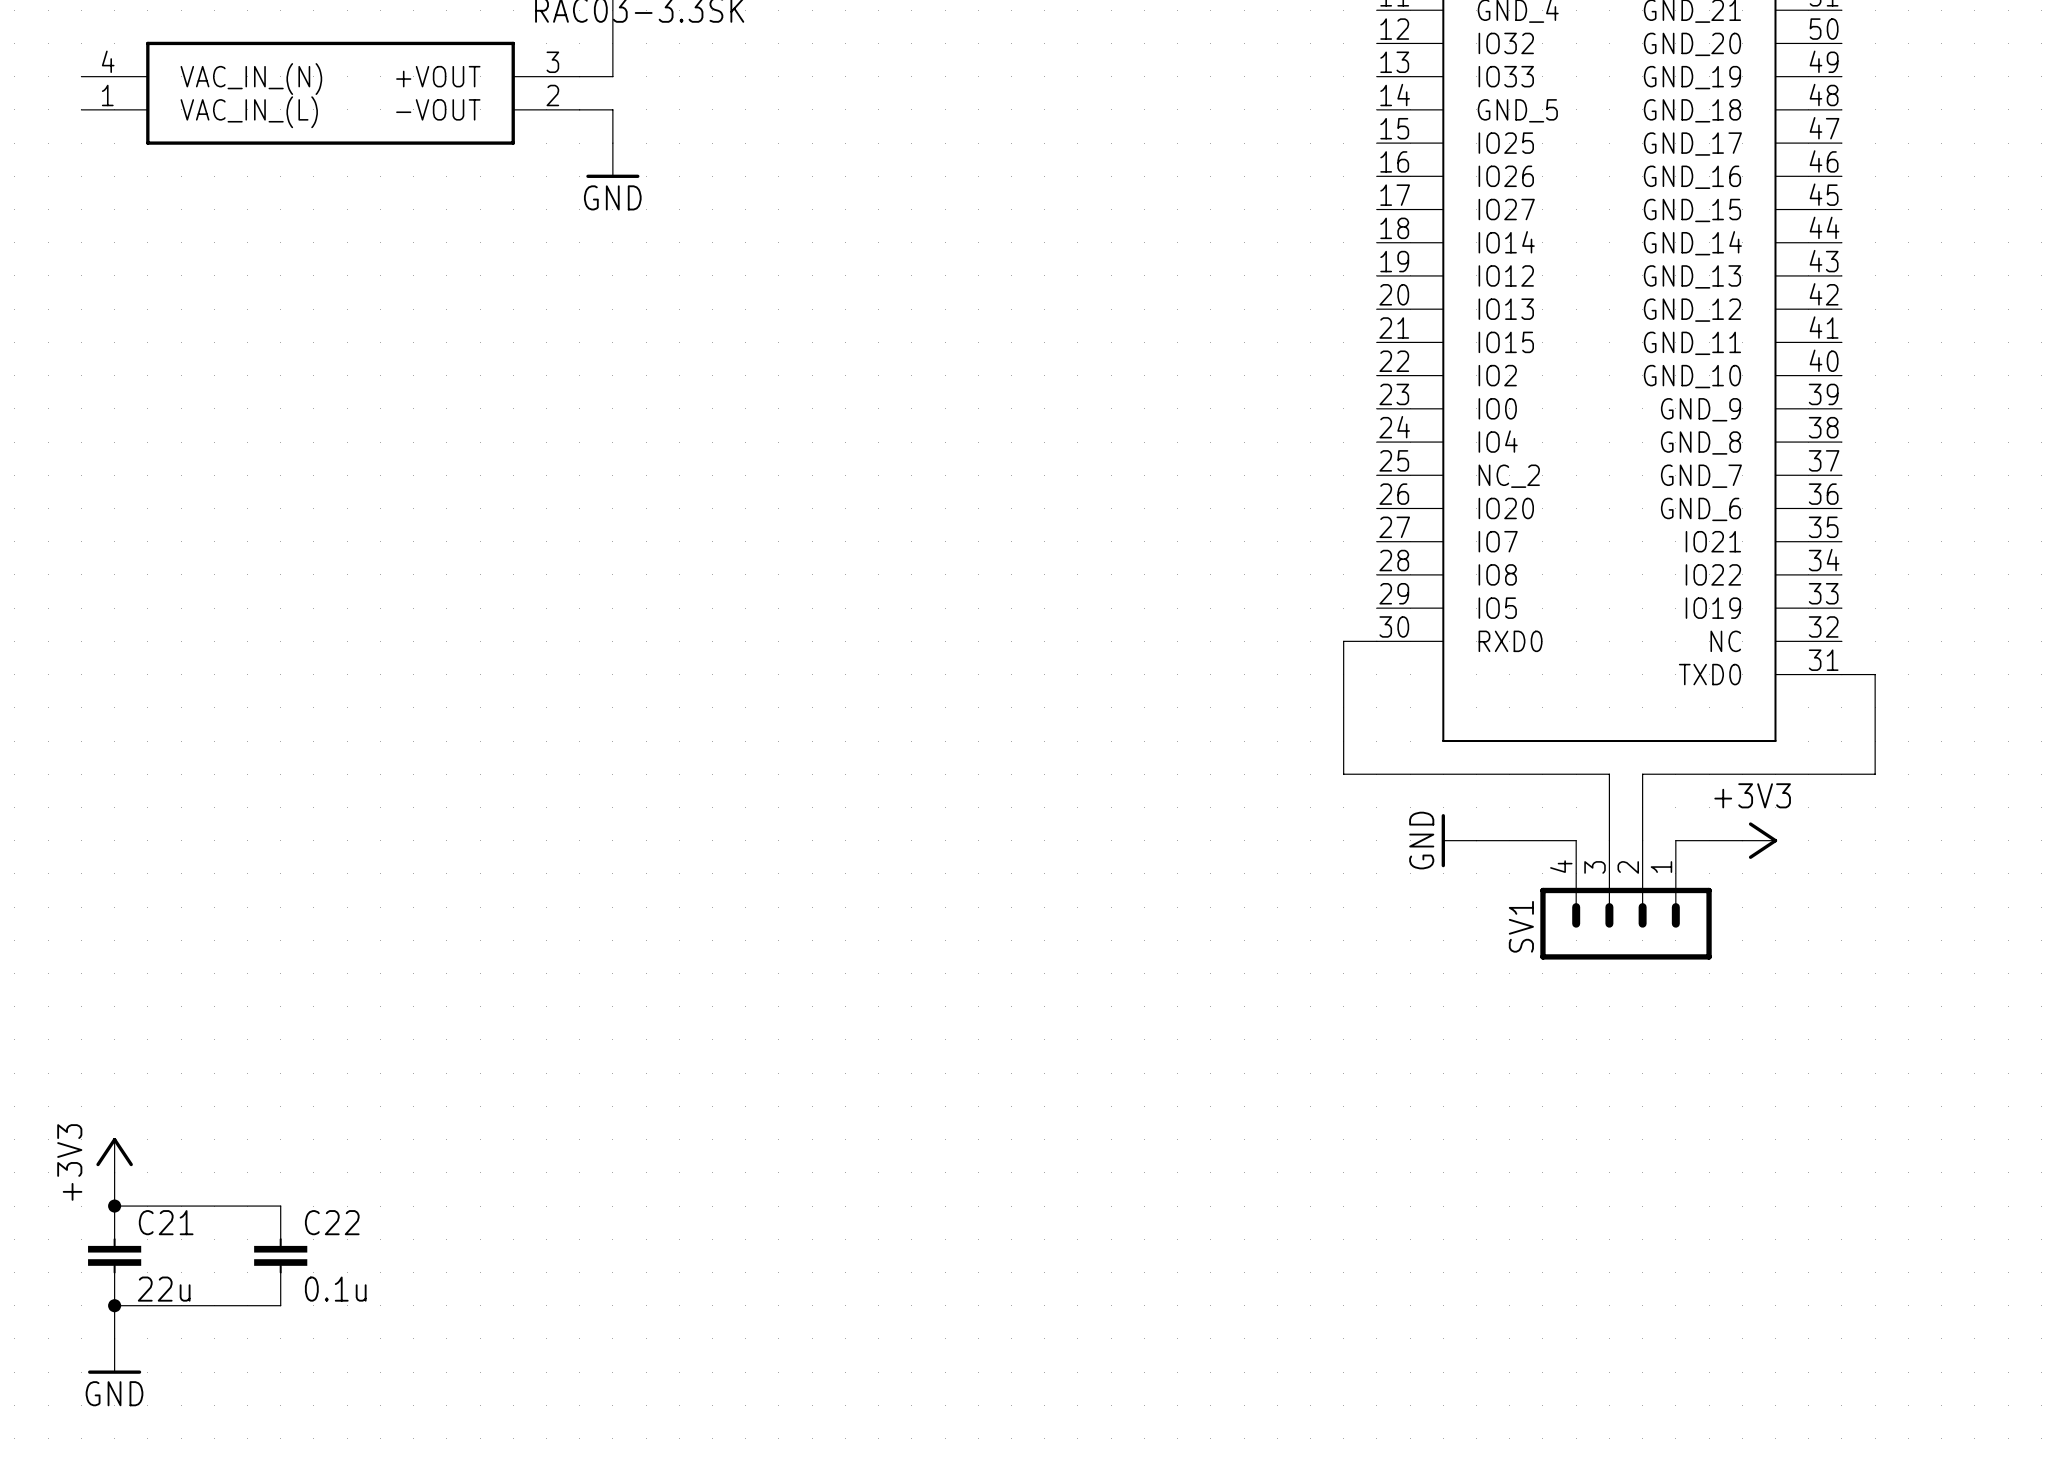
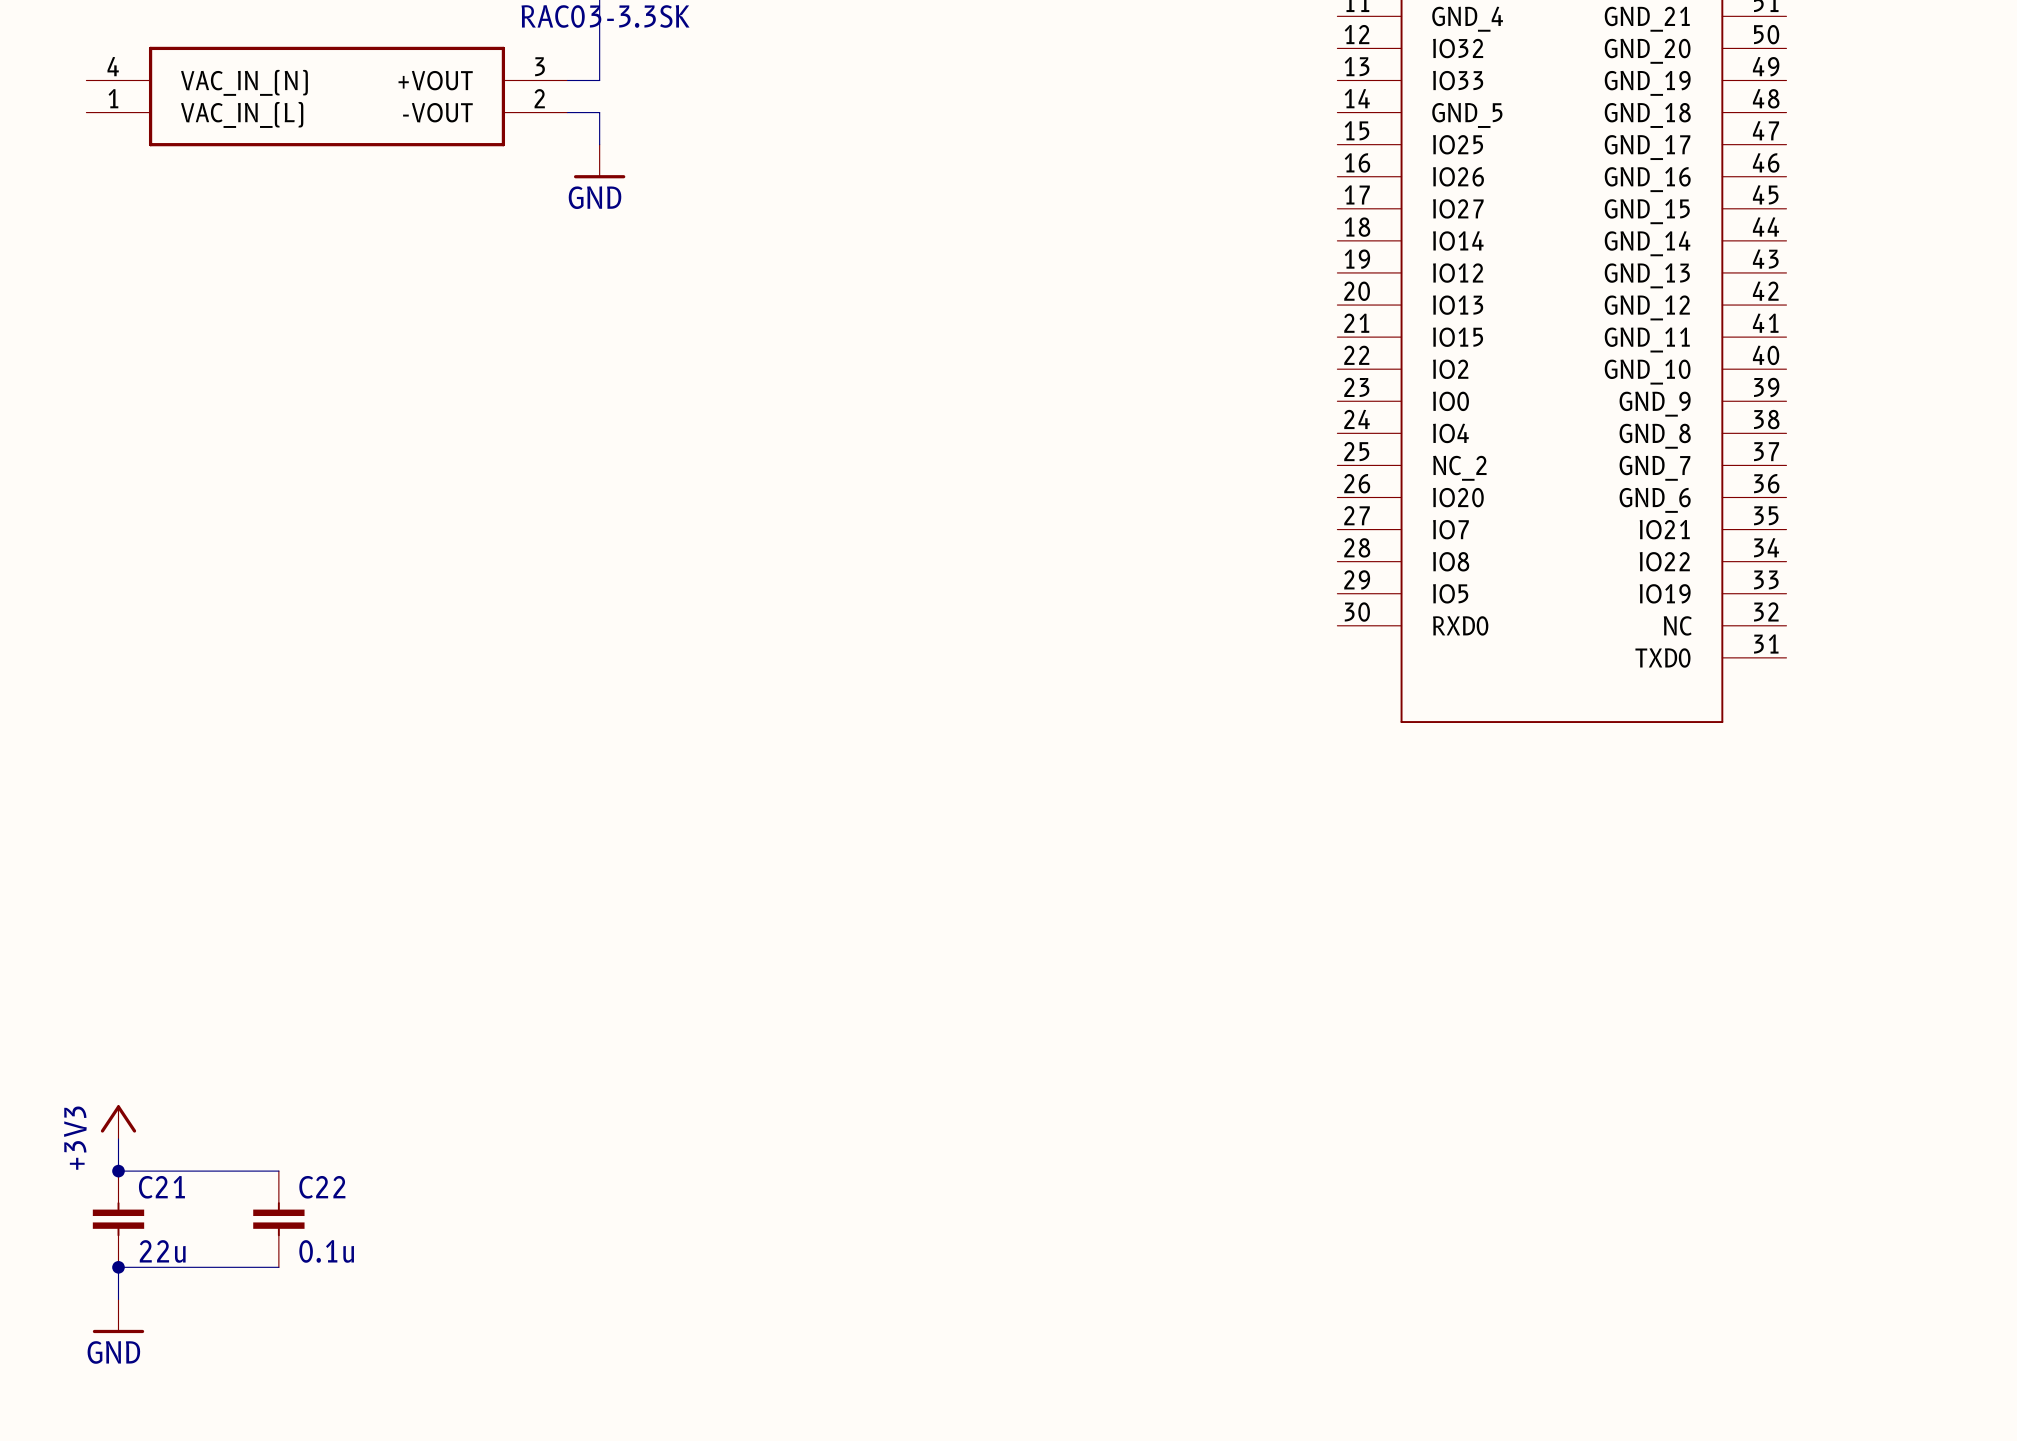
wire: (1376, 641) (1343, 641) (1343, 774) (1609, 774) (1609, 840) -> none
wire: (1841, 674) (1875, 674) (1875, 774) (1642, 774) (1642, 840) -> none
power symbol: GND (1459, 840) -> none
wire: (1476, 840) (1576, 840) -> none
wire: (1675, 840) (1742, 840) -> none
power symbol: +3V3 (1759, 840) -> none
SV1: (1626, 900) -> none

